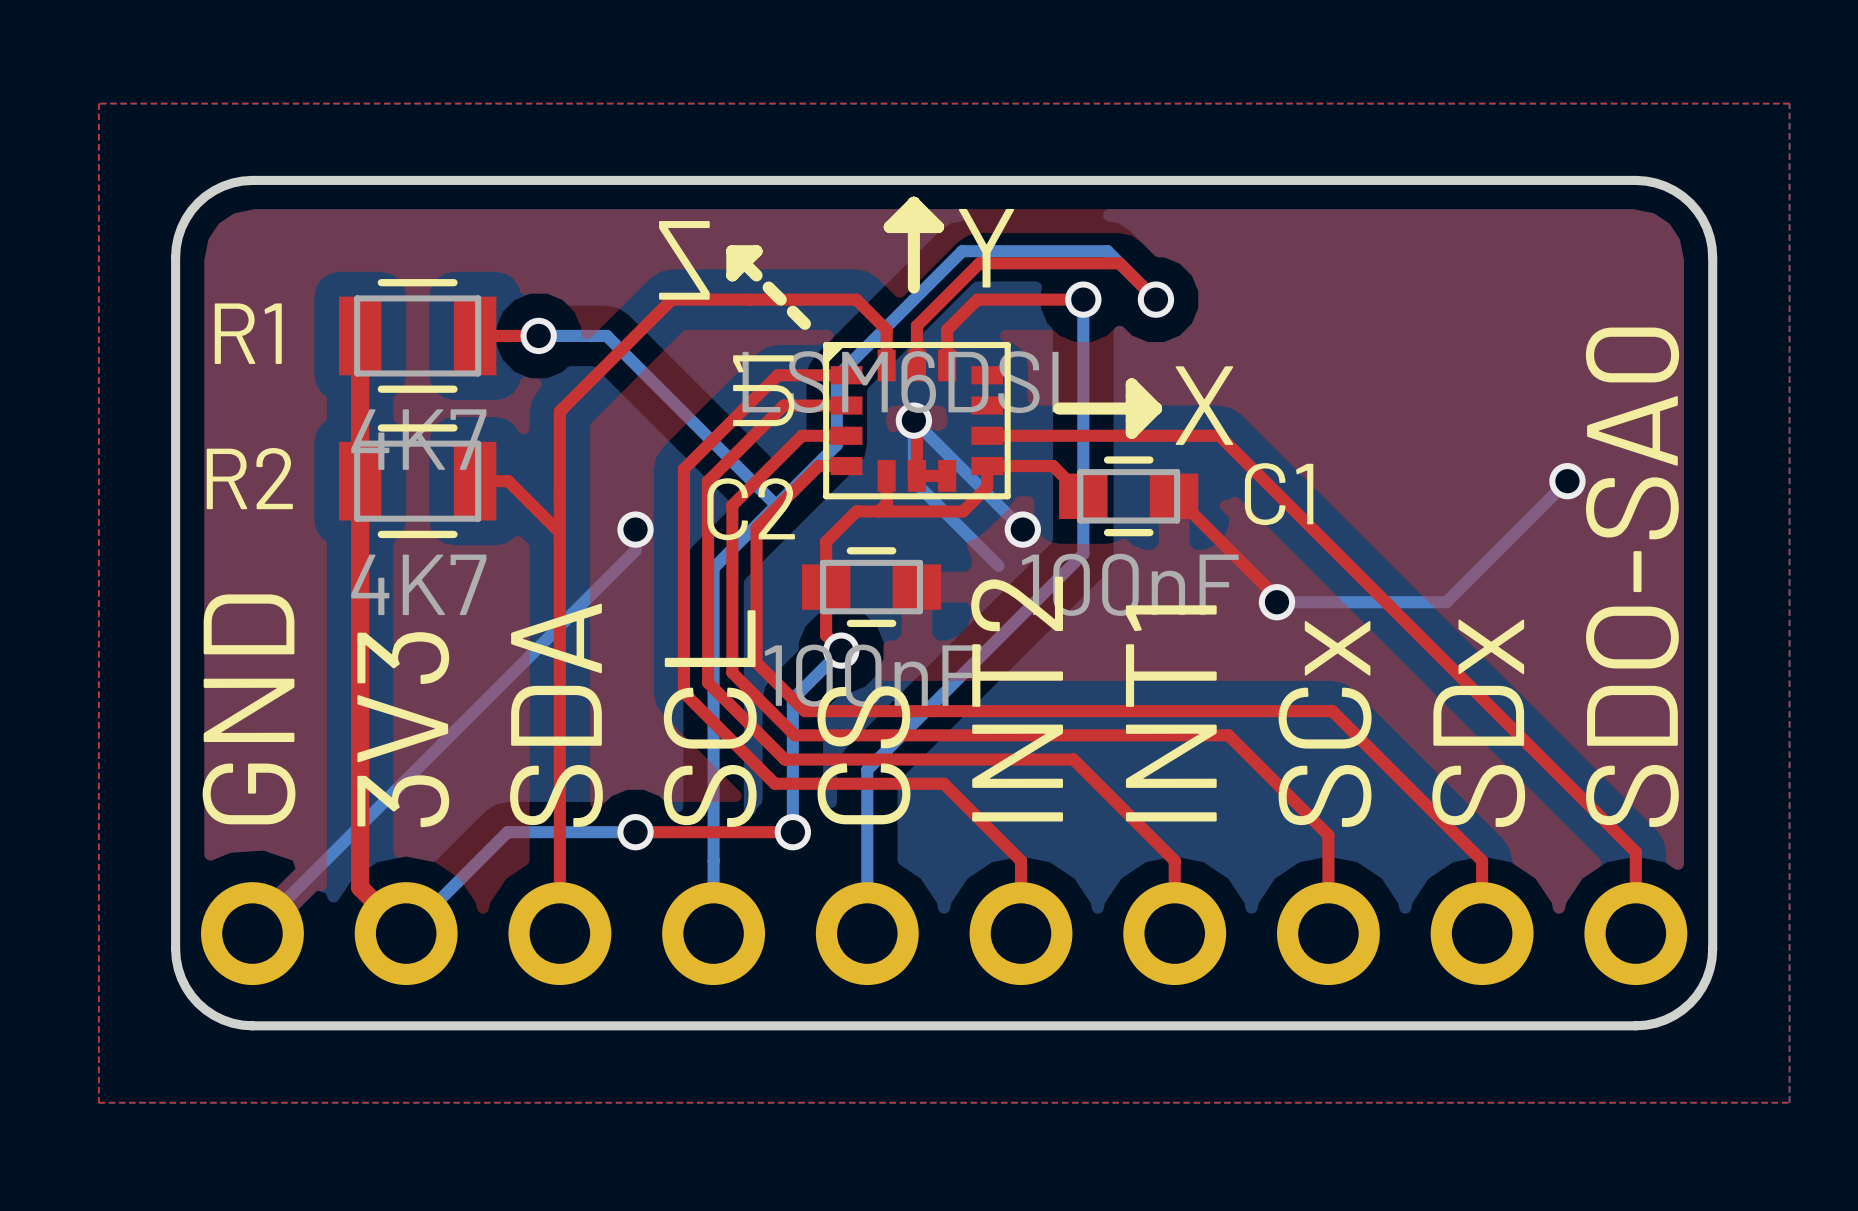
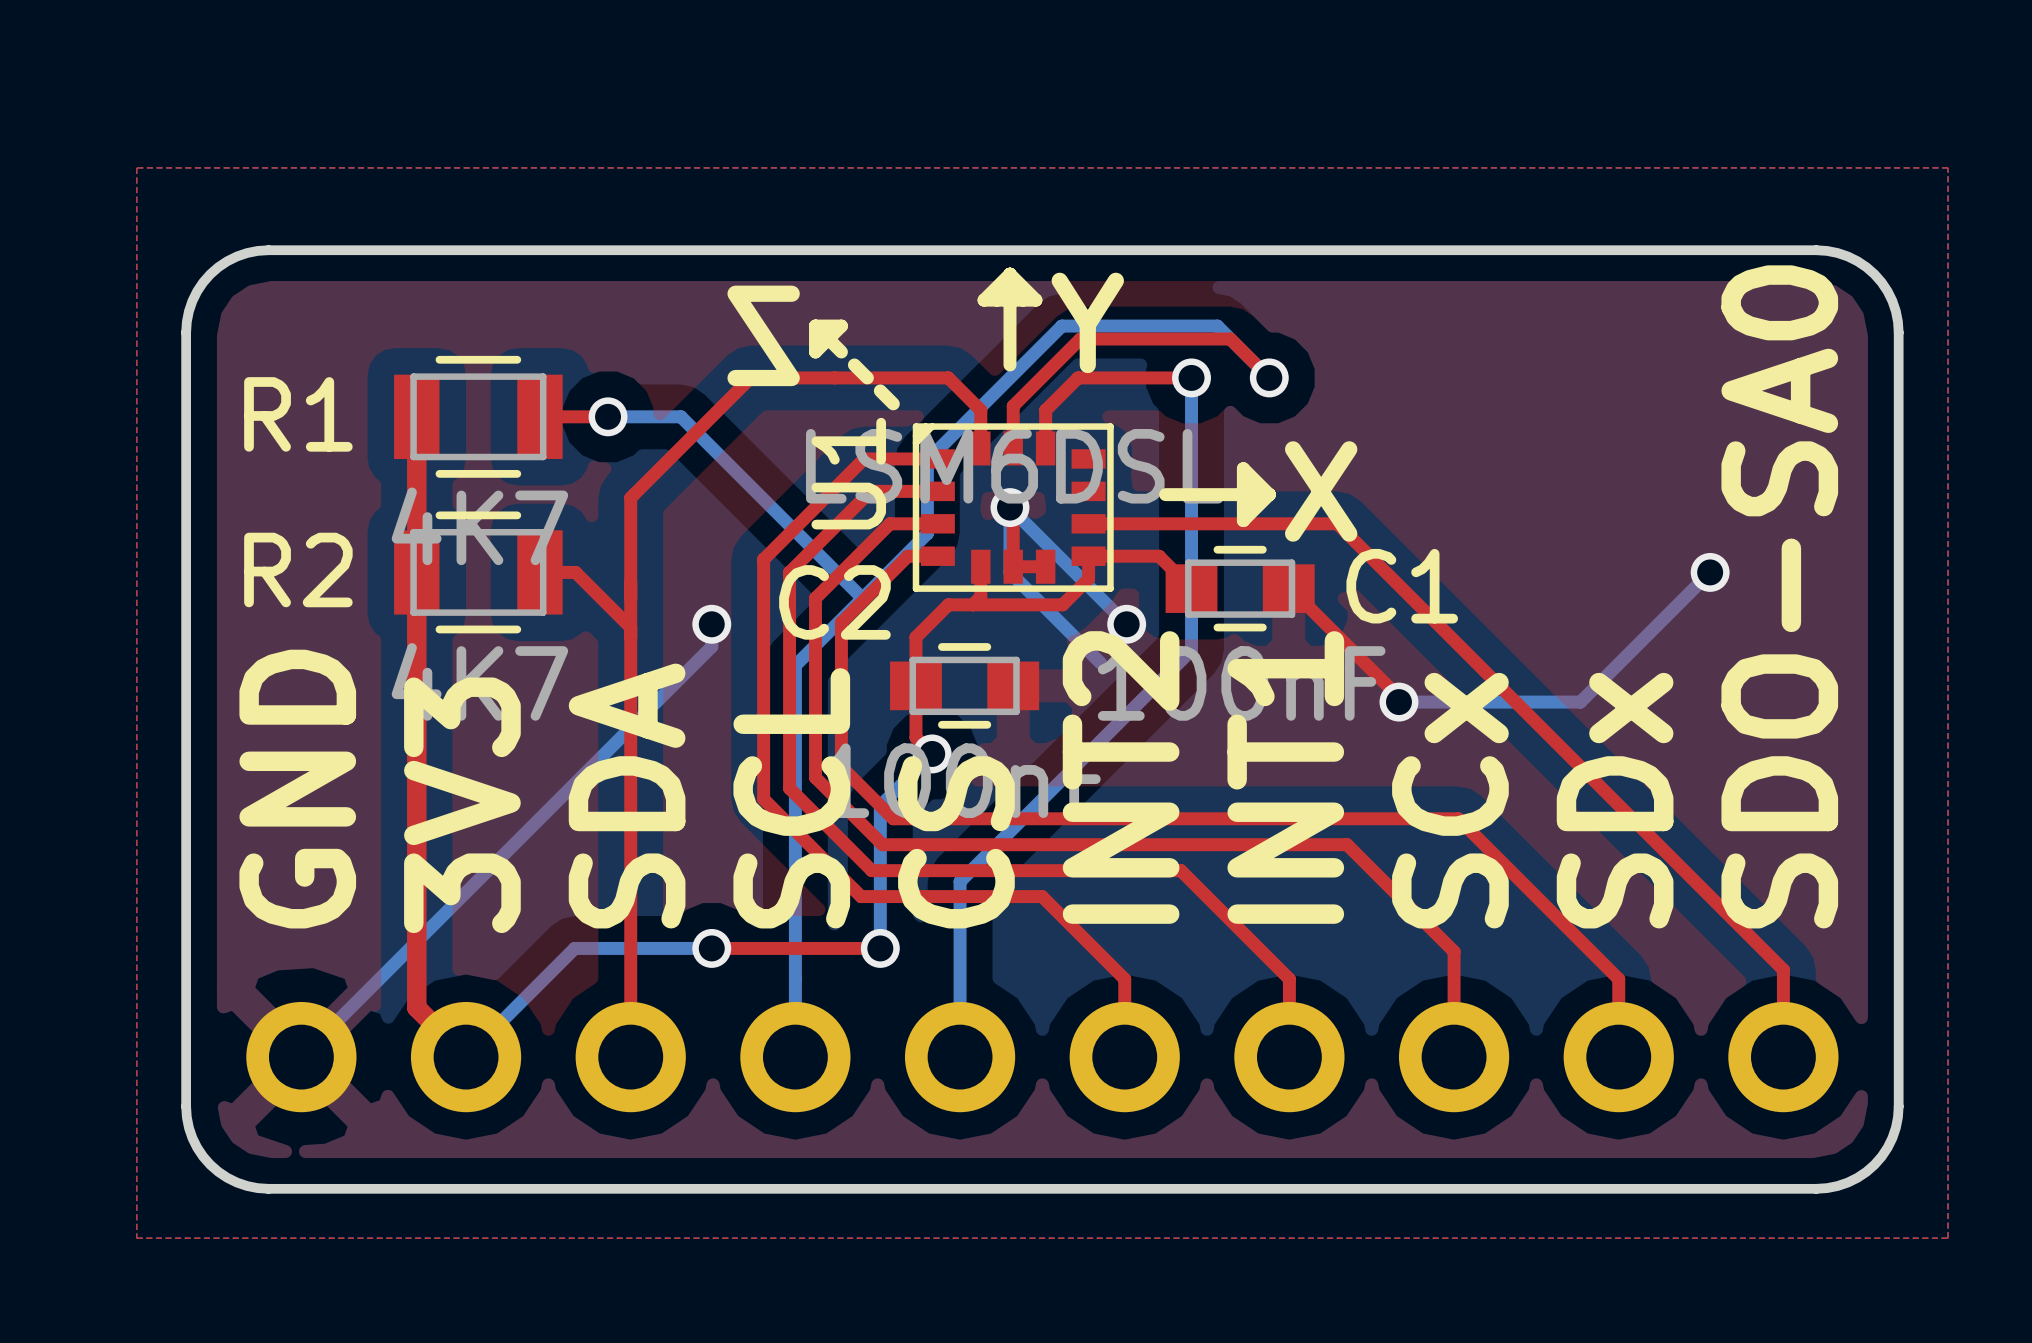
board edge: (252, 180) (223, 186) (198, 202) (181, 227) (175, 257) (176, 958) (185, 987) (205, 1009) (232, 1023) (252, 1025) (1635, 1025) (1655, 1023) (1674, 1015) (1690, 1003) (1702, 987) (1710, 968) (1712, 948) (1712, 257) (1706, 227) (1690, 202) (1665, 186) (1635, 180) -> (301, 250) (268, 250) (247, 253) (218, 267) (197, 291) (188, 311) (186, 332) (186, 1117) (197, 1147) (218, 1171) (247, 1186) (268, 1188) (1816, 1188) (1837, 1186) (1857, 1177) (1874, 1164) (1887, 1147) (1895, 1127) (1898, 1106) (1897, 321) (1887, 291) (1874, 274) (1857, 261) (1827, 250) (1783, 250)

